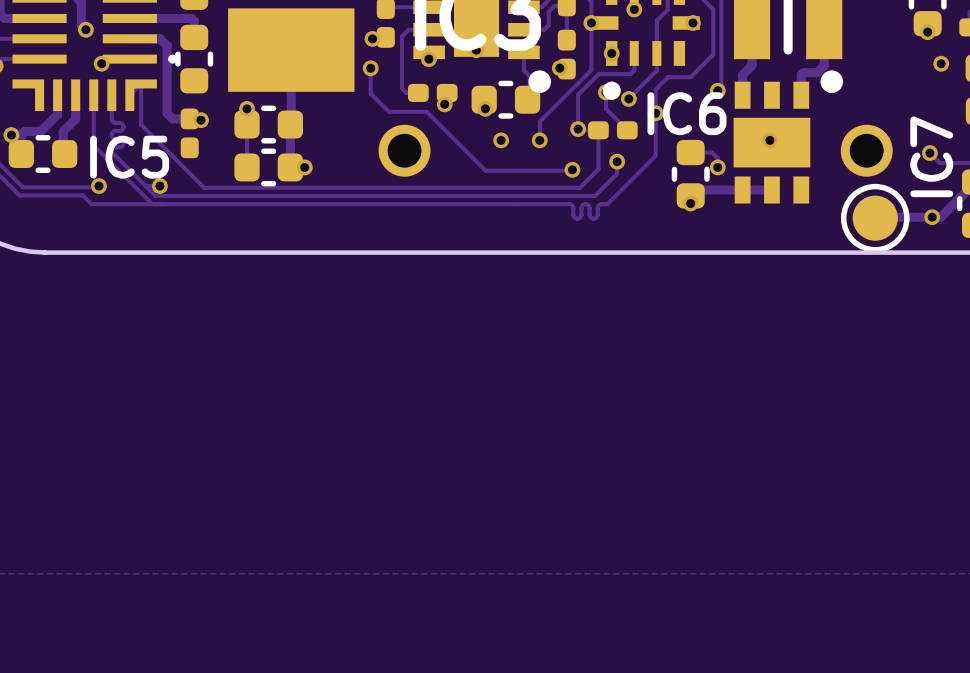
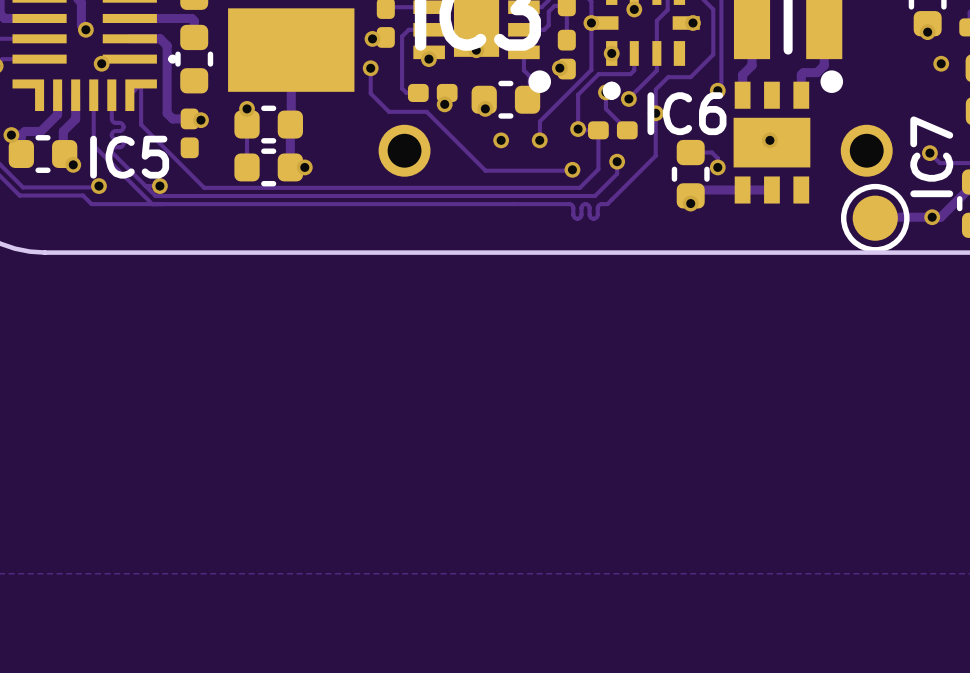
via: none -> (73, 164)

